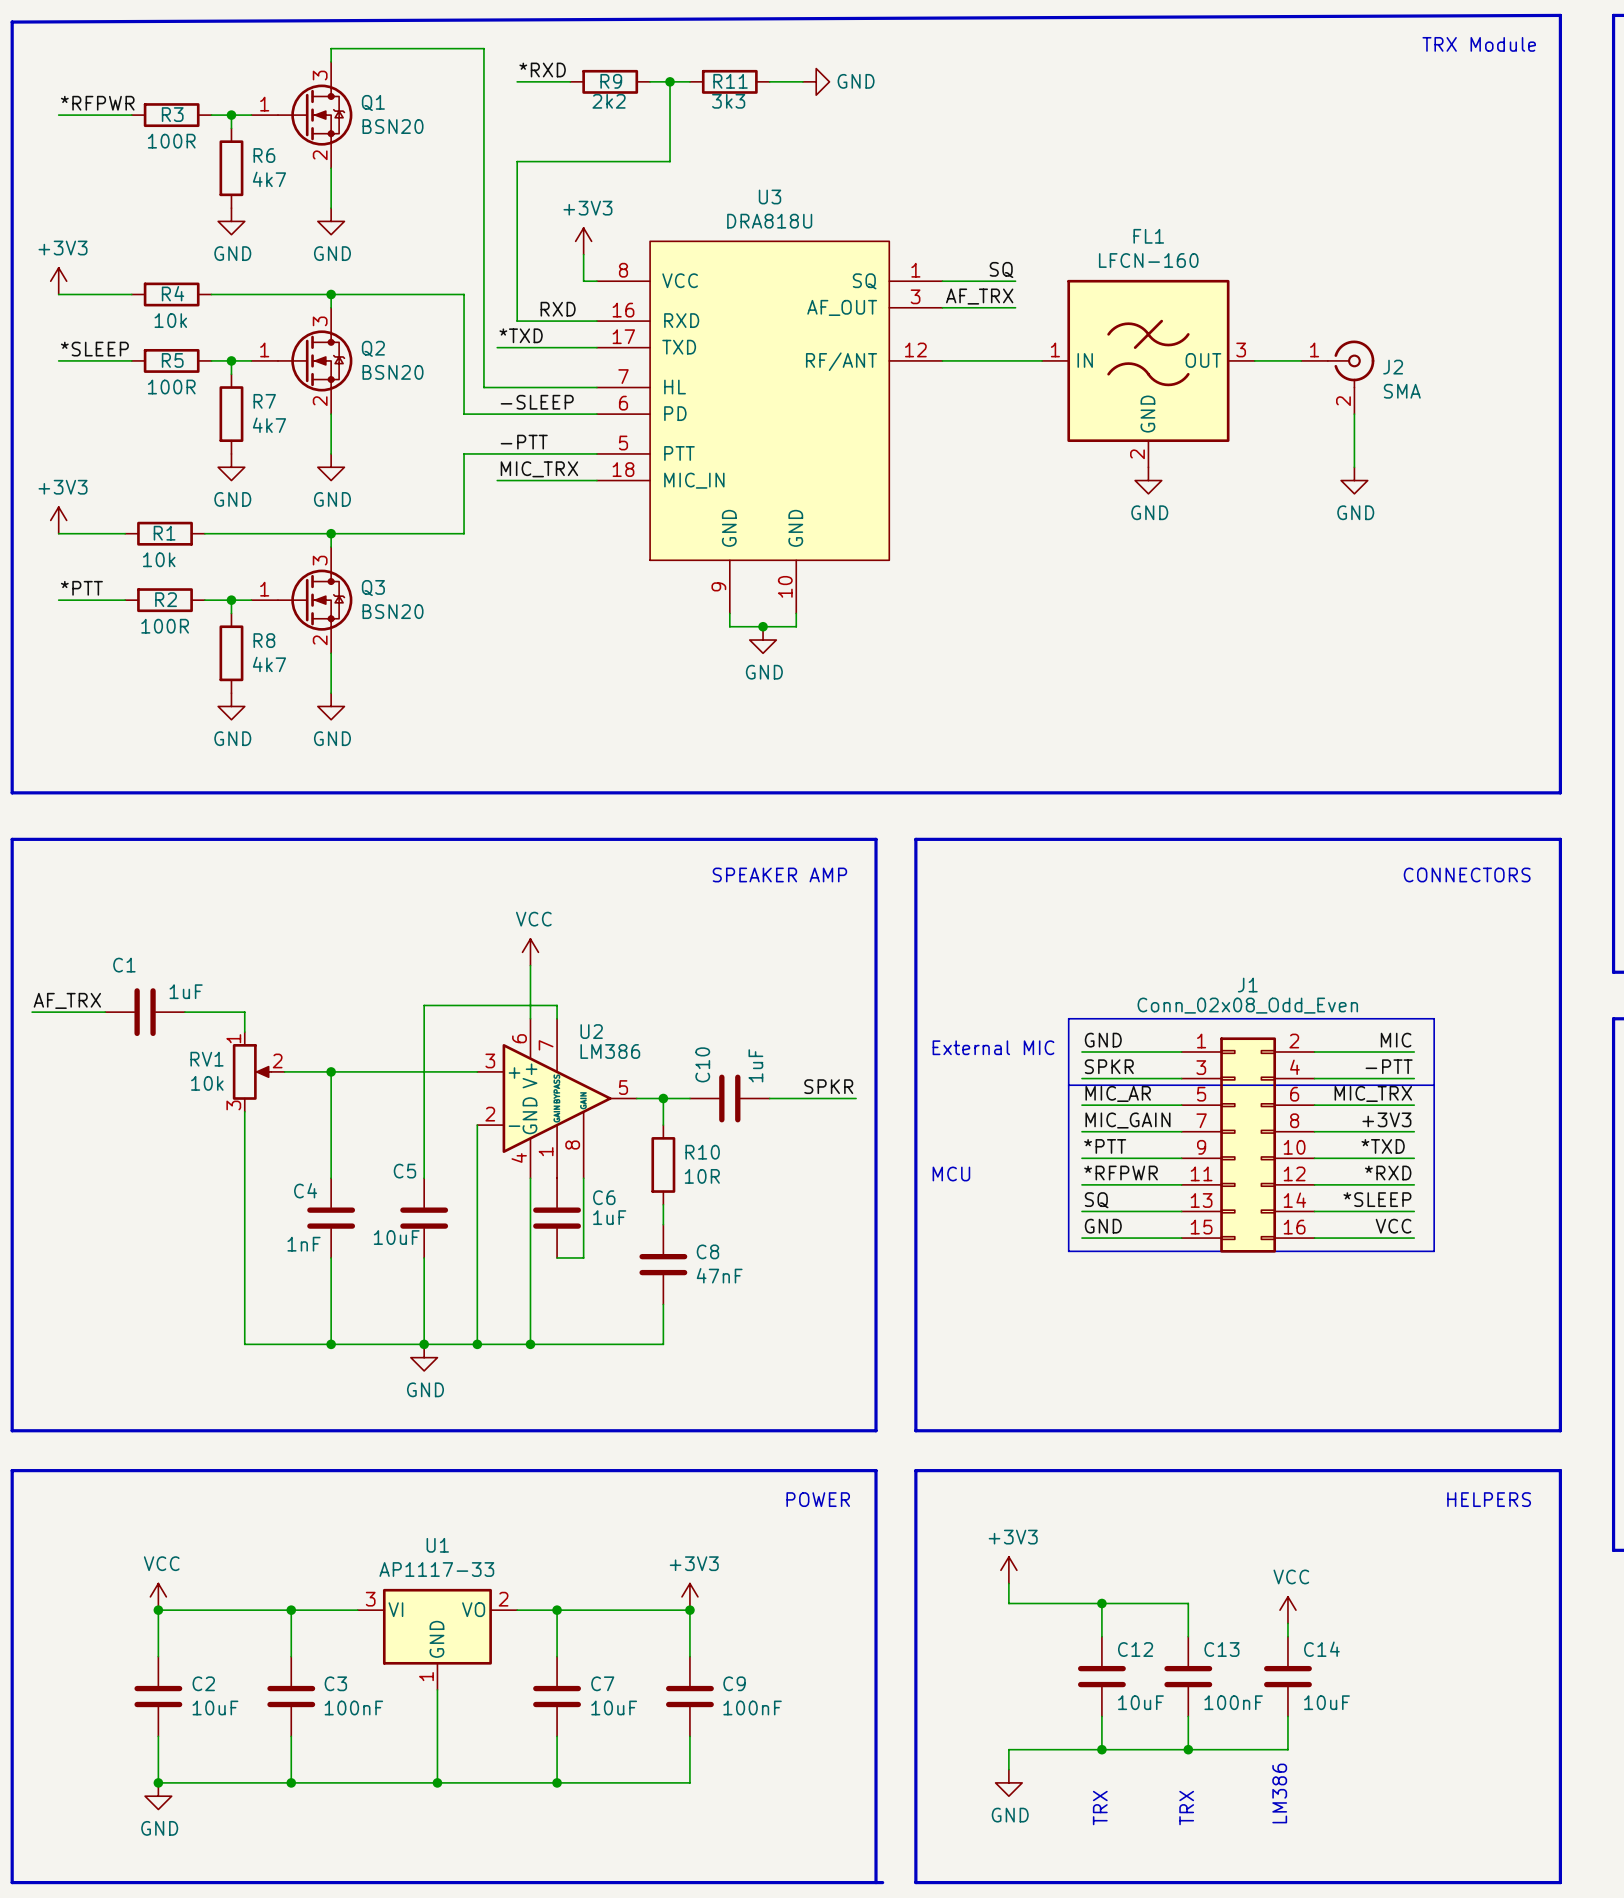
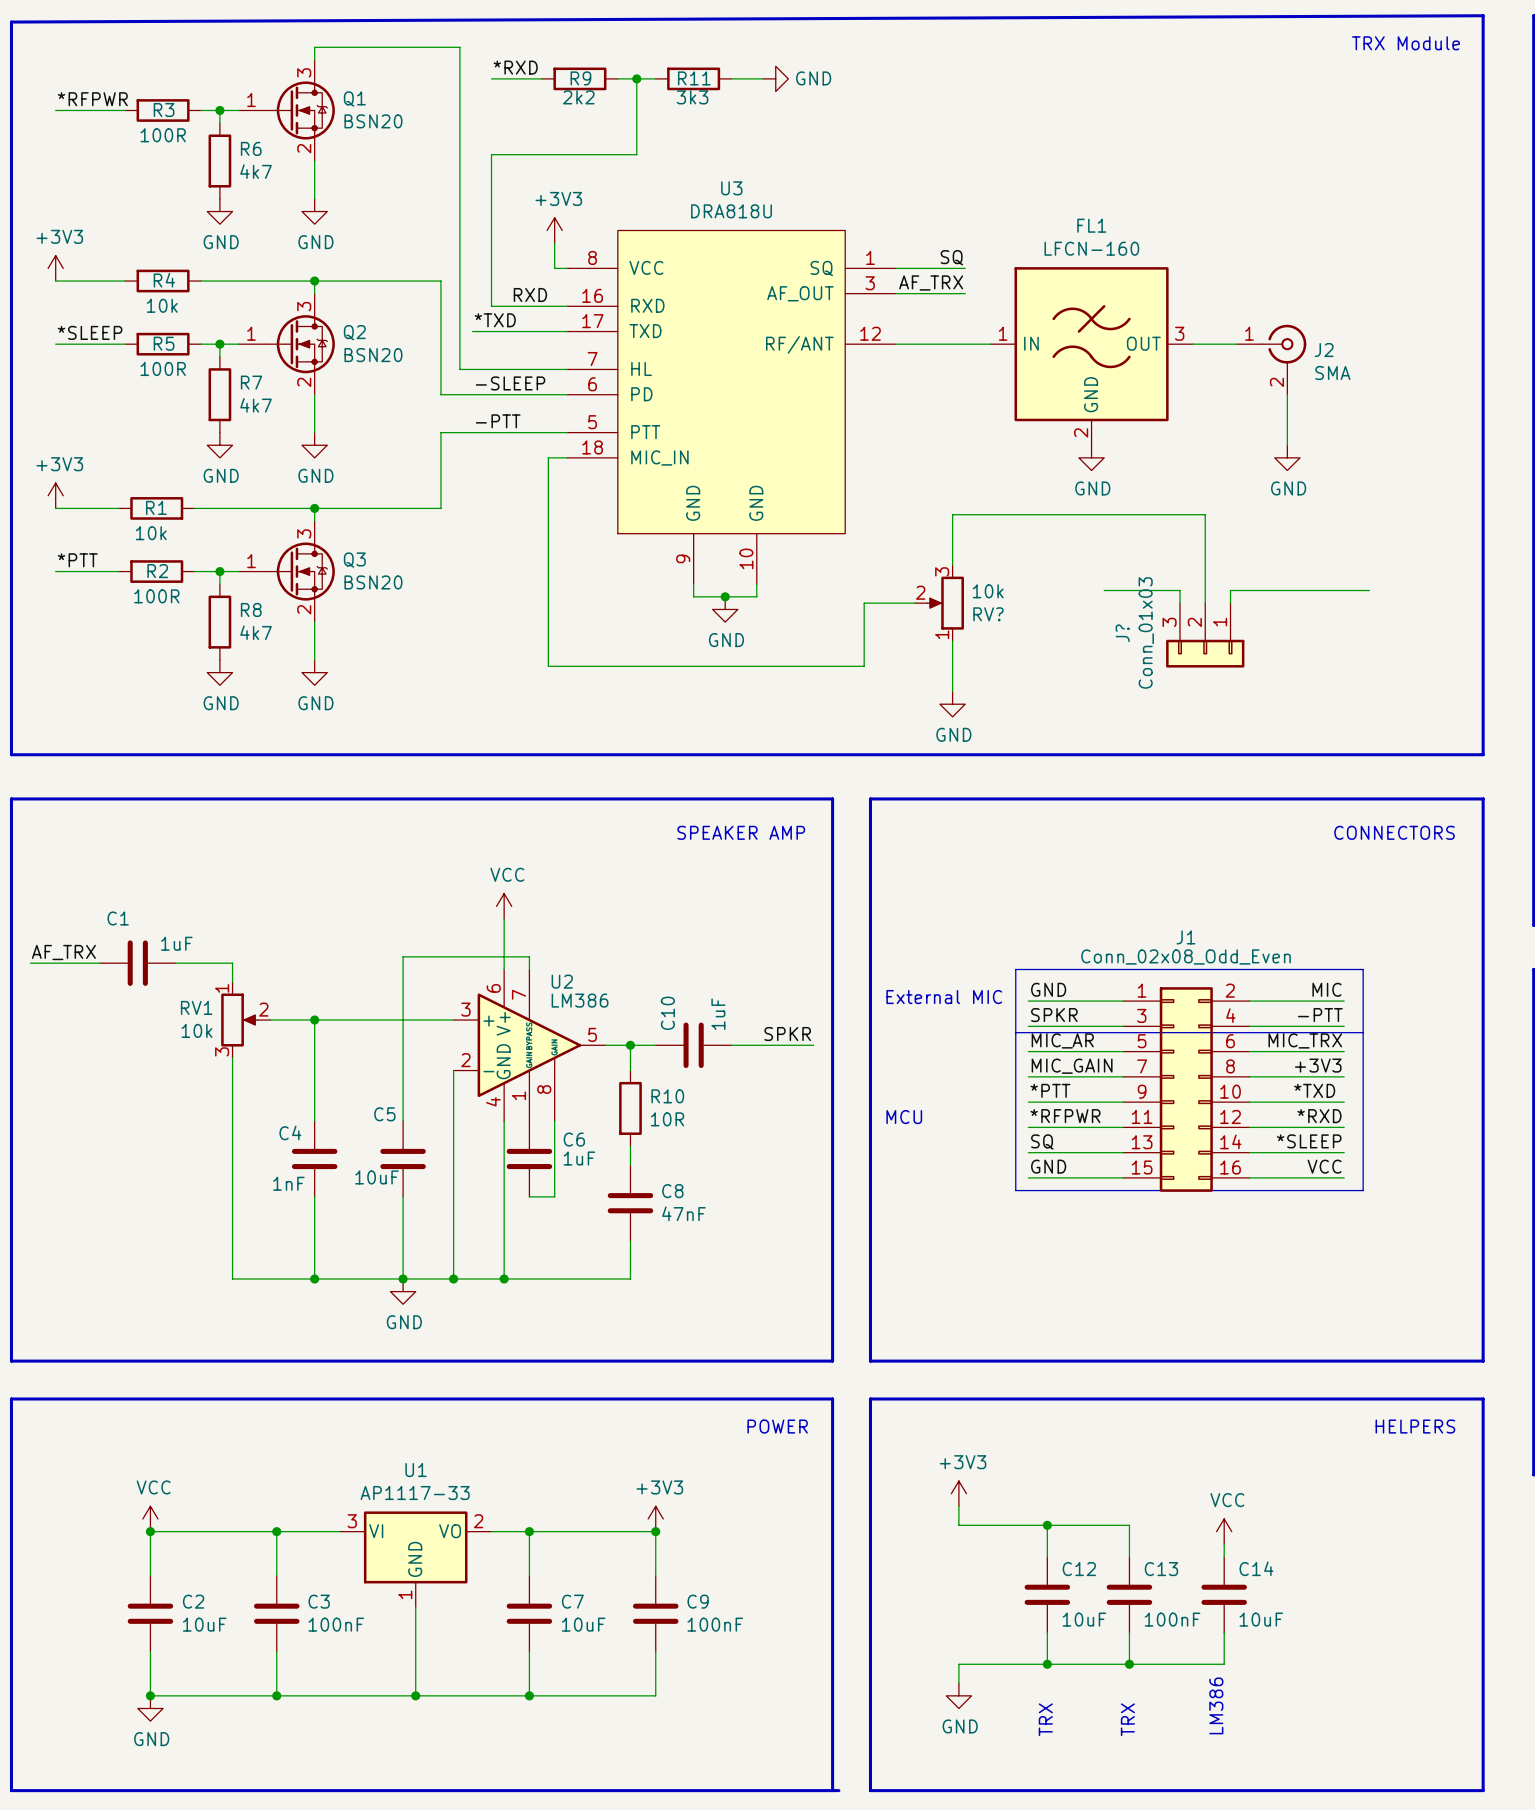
label: MIC_TRX (539, 469) -> none
wire: (497, 480) (576, 480) -> (914, 603) (864, 603) (864, 666) (548, 666) (548, 457)
wire: none -> (952, 565) (952, 514) (1205, 514) (1205, 603)
wire: none -> (1104, 590) (1179, 590) (1179, 603)
wire: none -> (1369, 590) (1230, 590) (1230, 603)
RV?: none -> 10k (939, 603)
J?: none -> Conn_01x03 (1205, 635)
wire: none -> (952, 641) (952, 691)
power symbol: none -> GND (952, 704)

